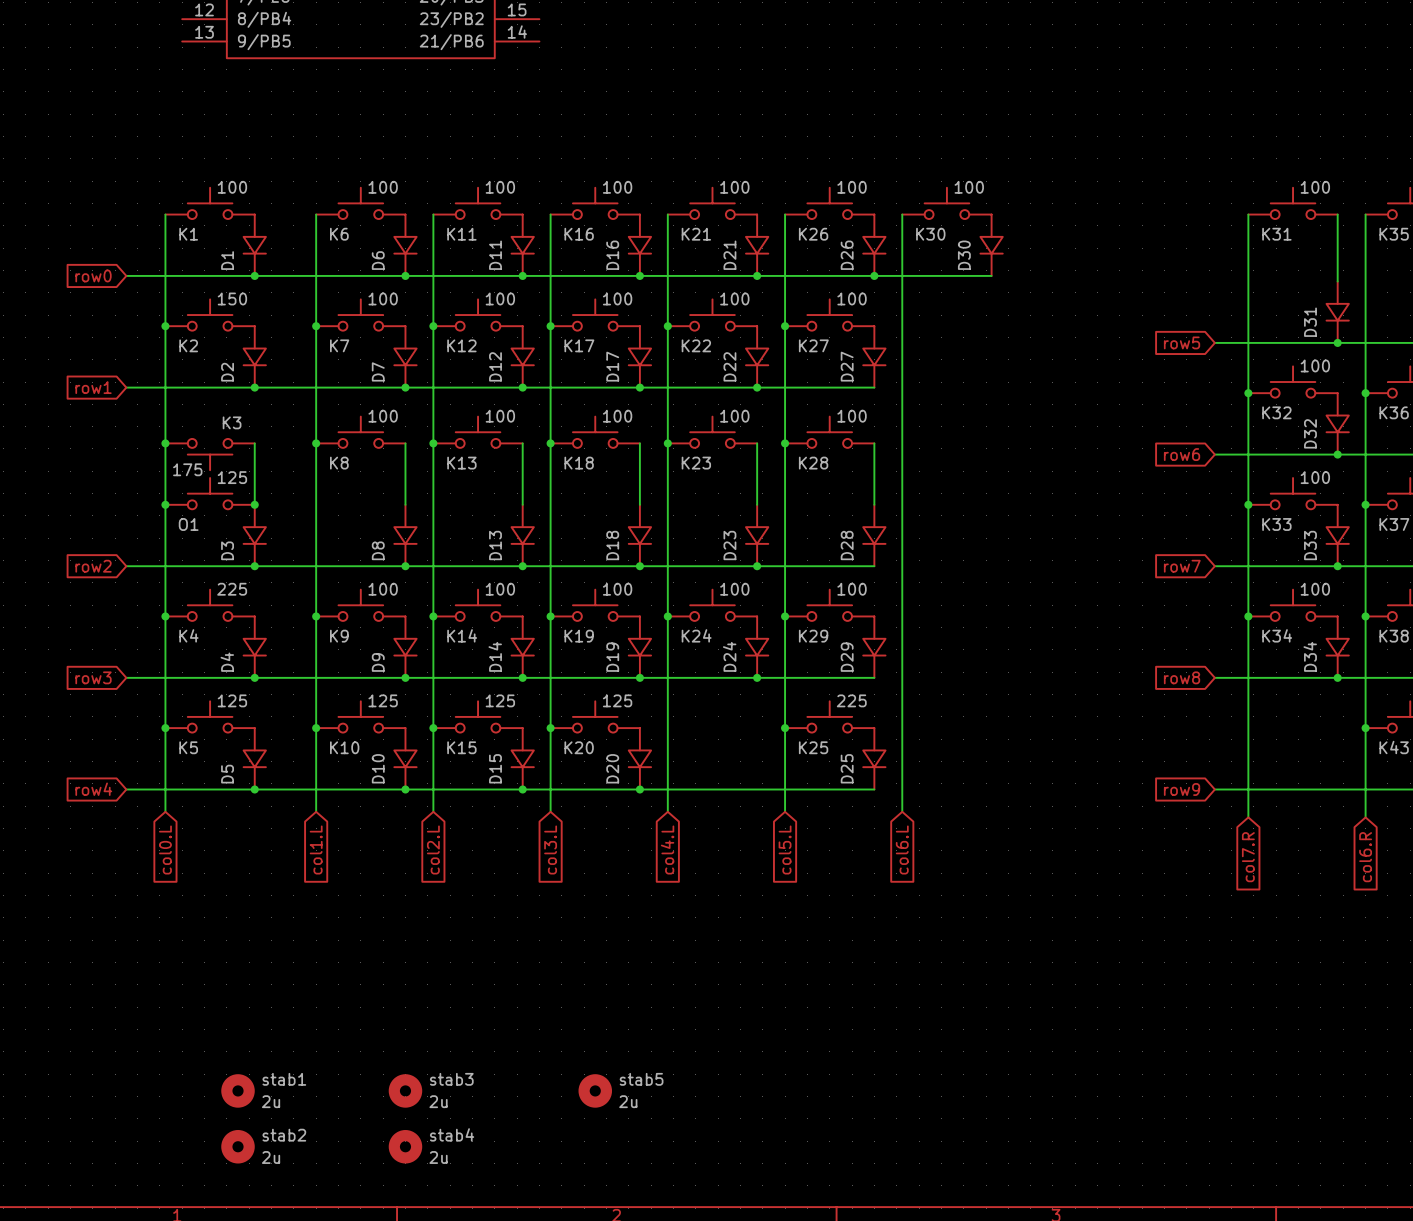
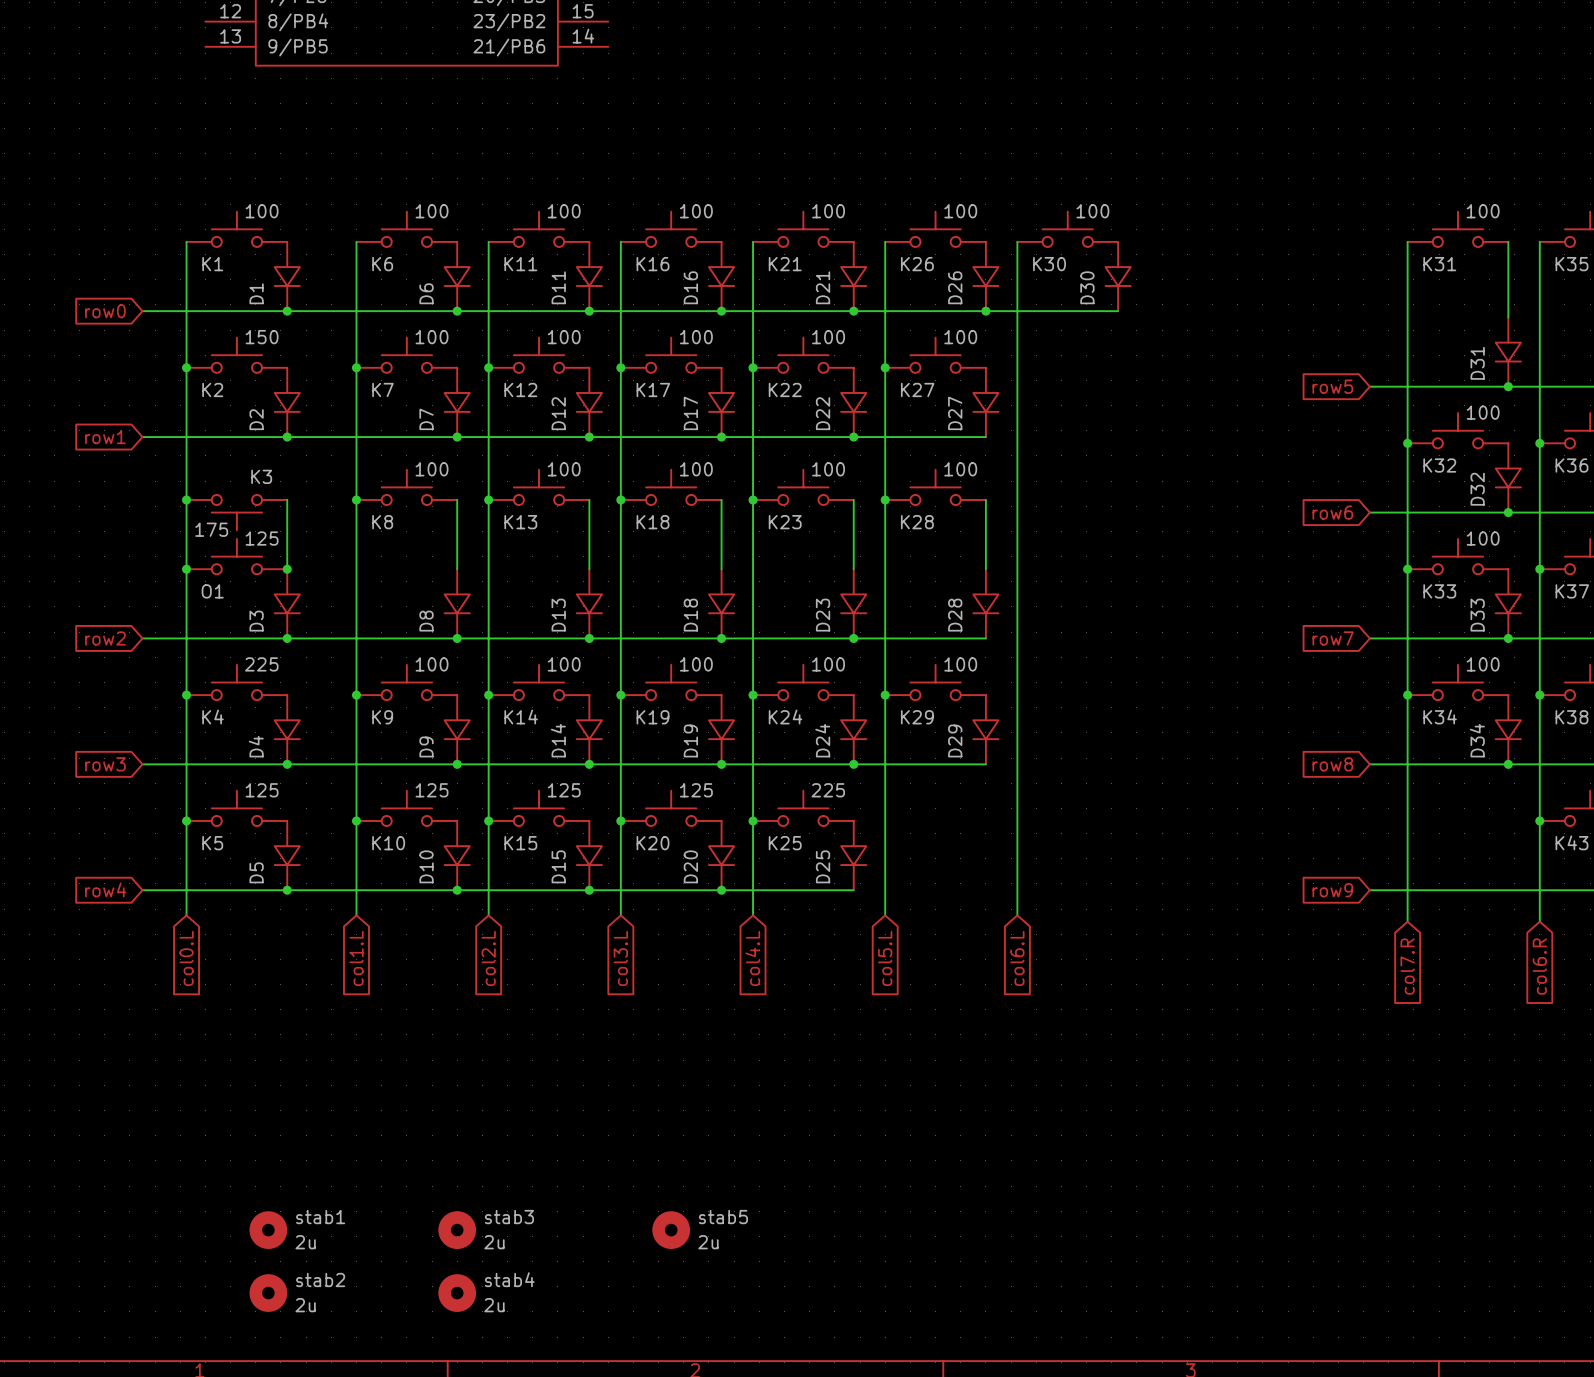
K25 position: (829, 716) -> (803, 808)
junction: none -> (753, 820)
junction: (785, 728) -> none
D25 position: (874, 758) -> (853, 855)
wire: (757, 789) (874, 789) -> none

